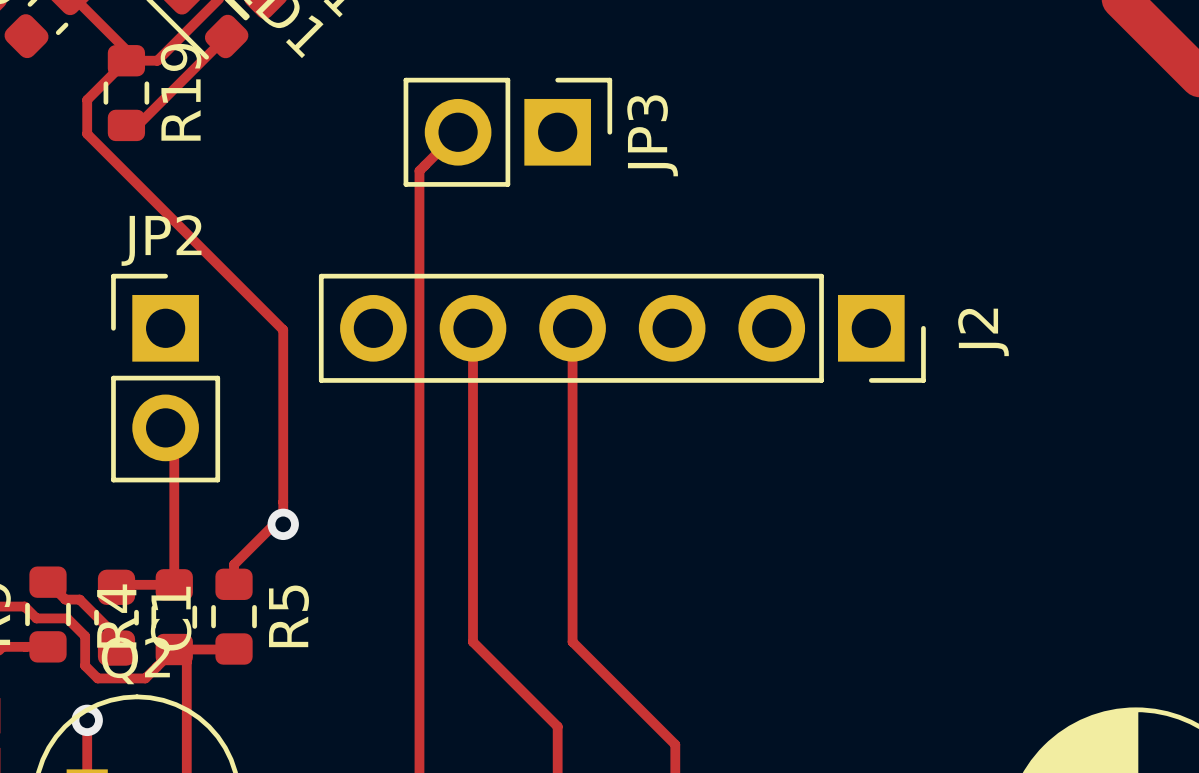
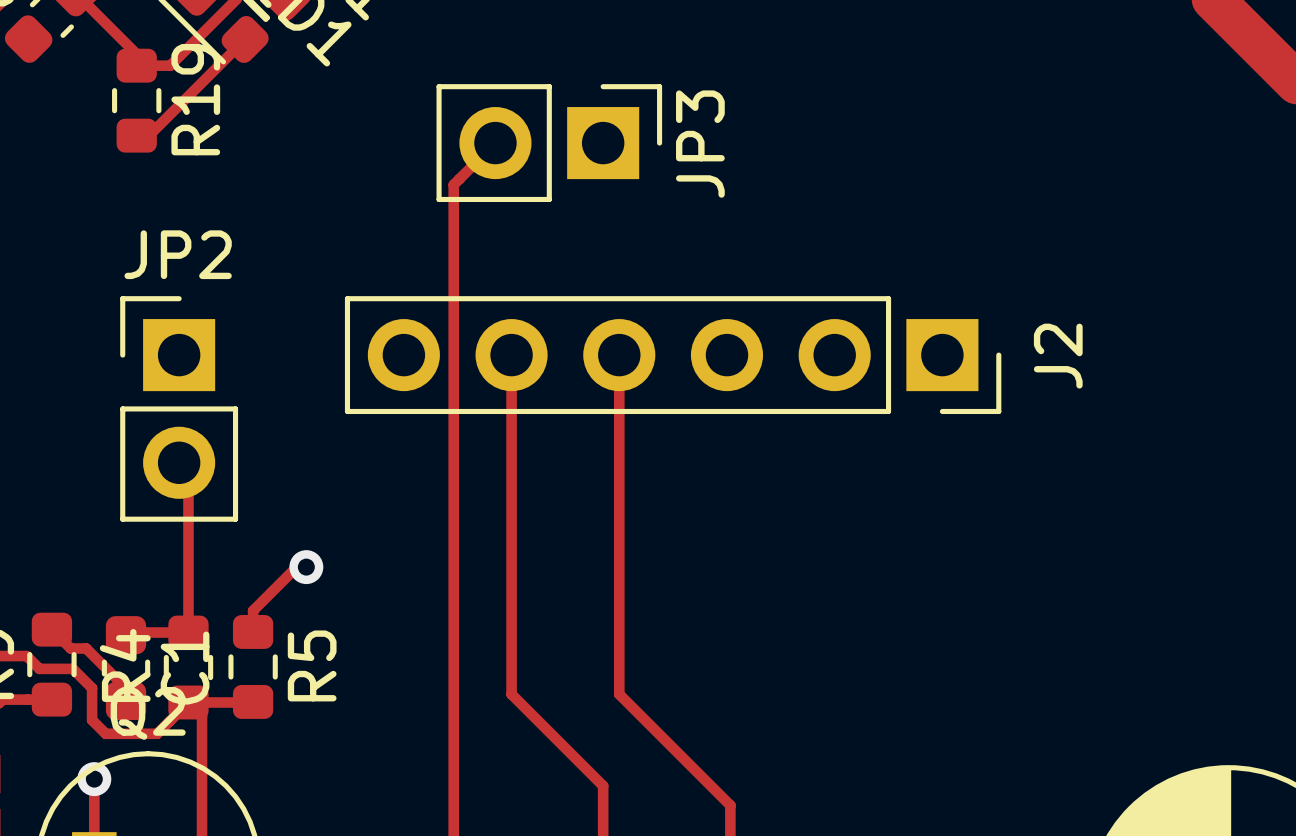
track: (126, 60) (87, 99) (87, 133) (283, 329) (283, 524) -> none

